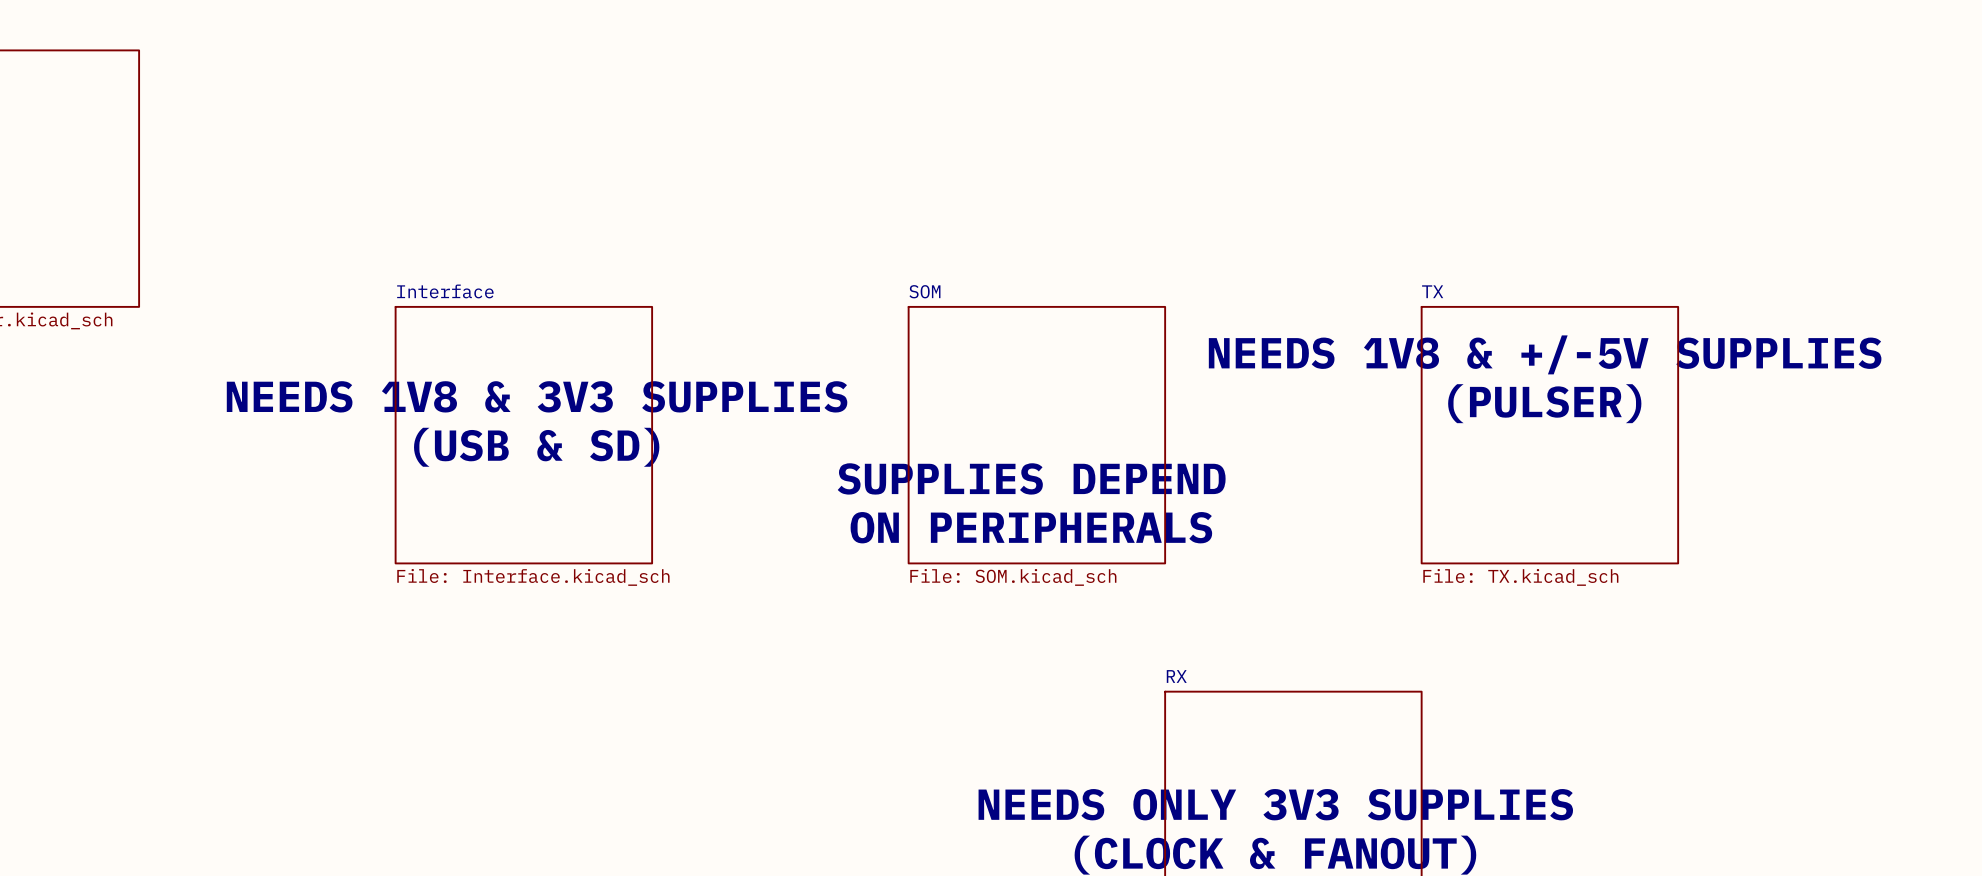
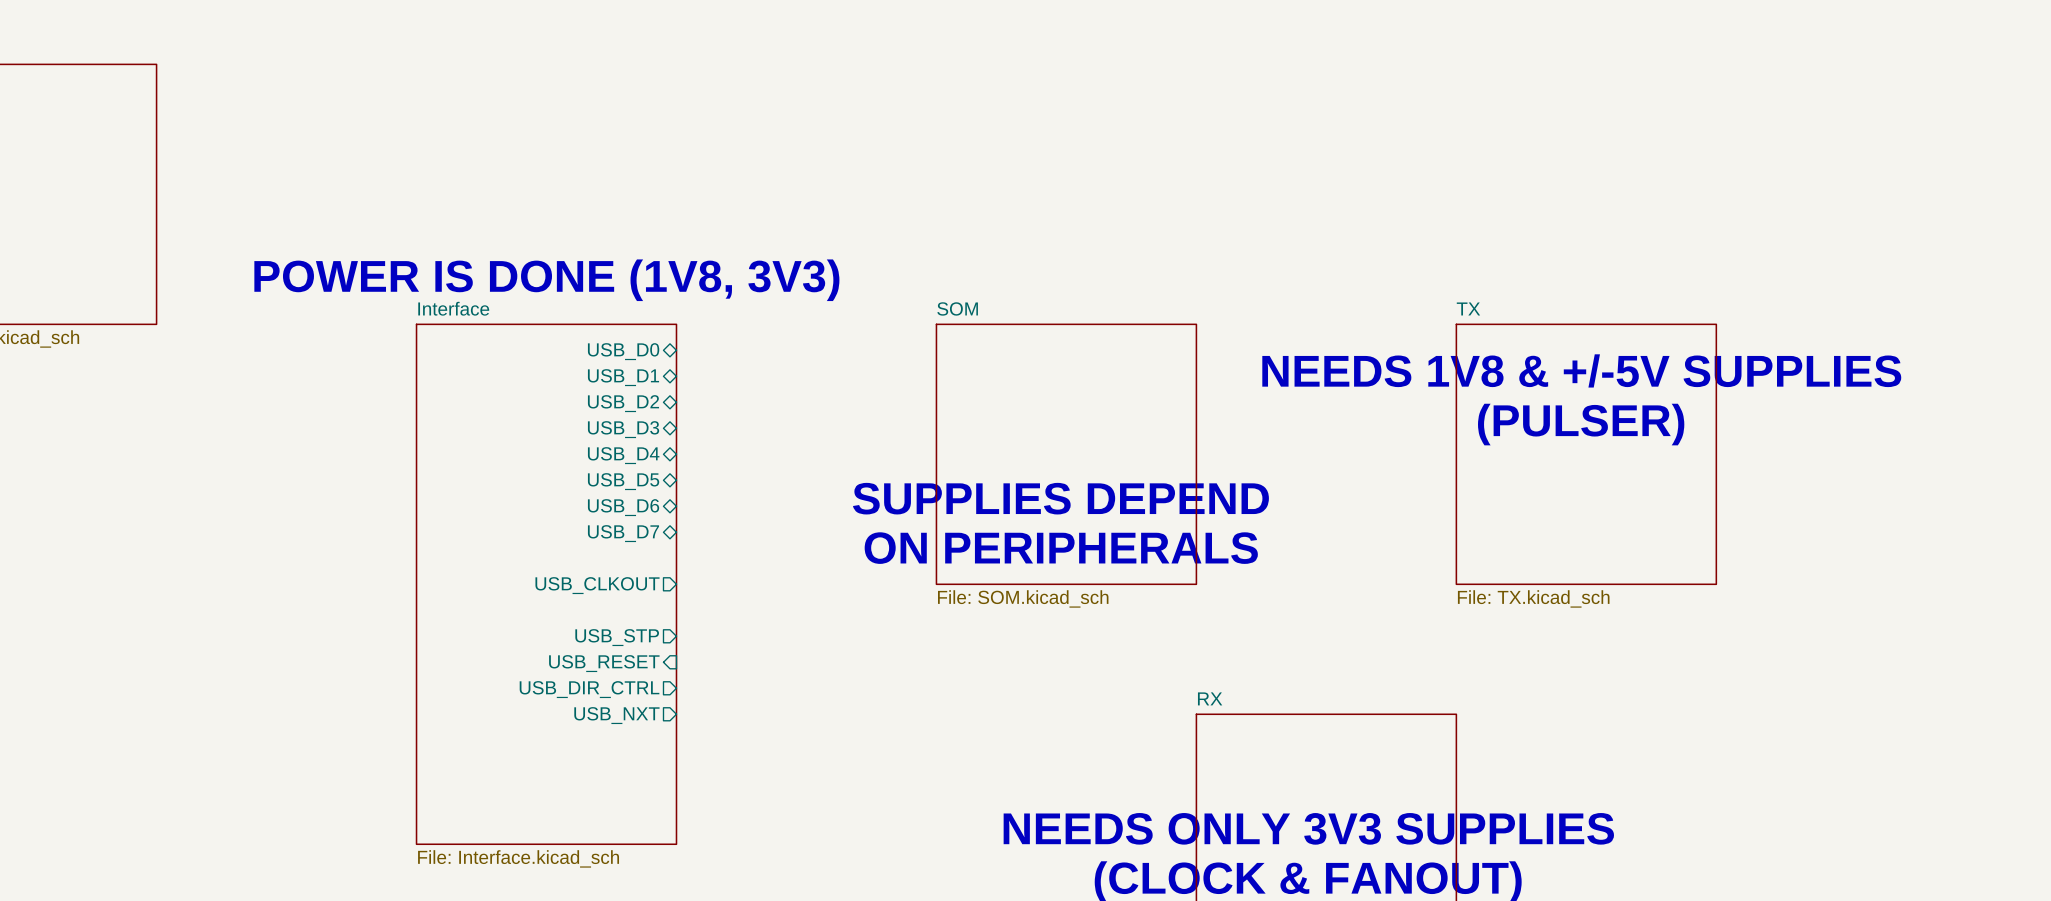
text: none -> POWER IS DONE (1V8, 3V3) (546, 280)
sheet pin: none -> USB_D0 (623, 351)
sheet pin: none -> USB_D1 (623, 377)
sheet pin: none -> USB_D2 (623, 403)
text: NEEDS 1V8 & 3V3 SUPPLIES (537, 396) -> none
sheet pin: none -> USB_D3 (623, 429)
sheet Interface: File: Interface.kicad_sch (523, 435) -> none
sheet pin: none -> USB_D4 (623, 455)
text: (USB & SD) (536, 447) -> none
sheet pin: none -> USB_D5 (623, 481)
sheet pin: none -> USB_D6 (623, 507)
sheet pin: none -> USB_D7 (623, 533)
sheet Interface: none -> File: Interface.kicad_sch (546, 584)
sheet pin: none -> USB_CLKOUT (597, 585)
sheet pin: none -> USB_STP (617, 637)
sheet pin: none -> USB_RESET (604, 663)
sheet pin: none -> USB_DIR_CTRL (589, 689)
sheet pin: none -> USB_NXT (616, 715)

